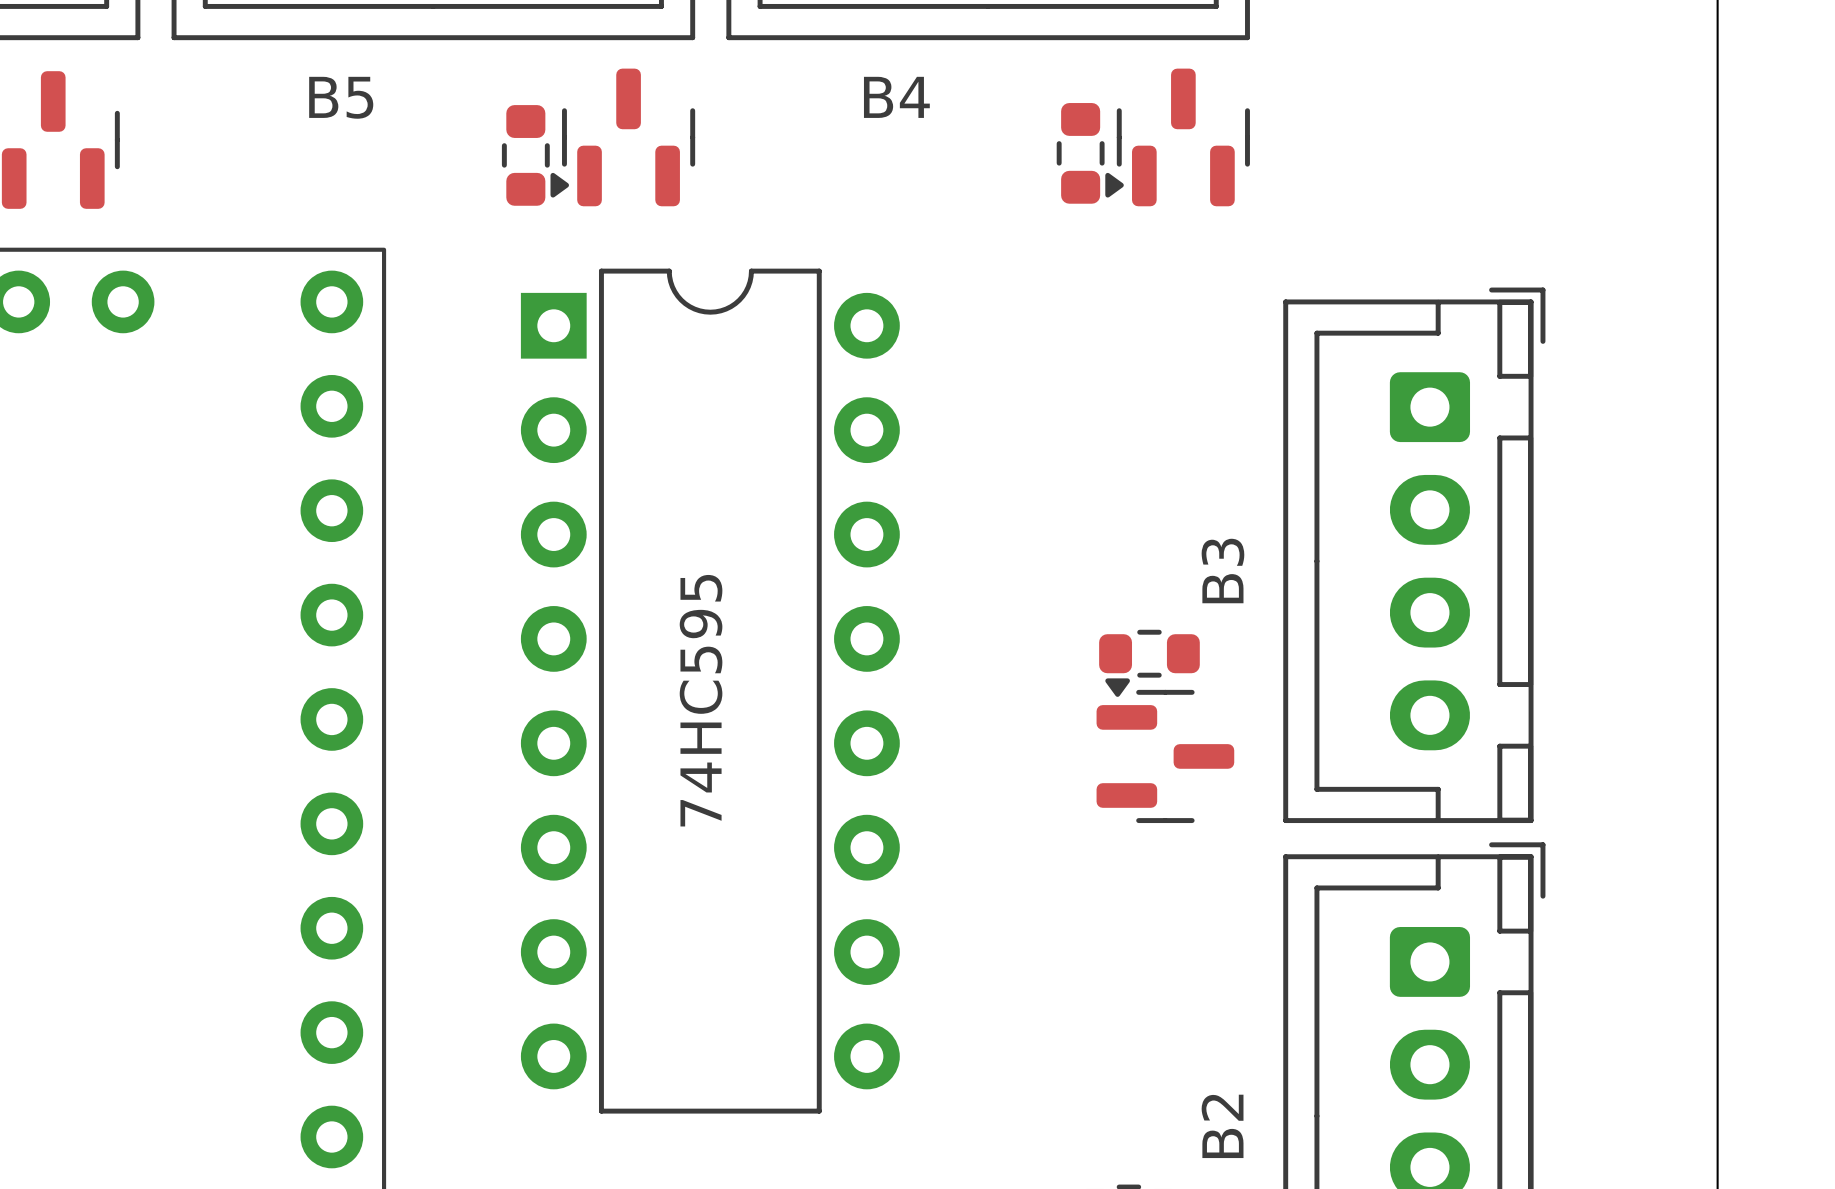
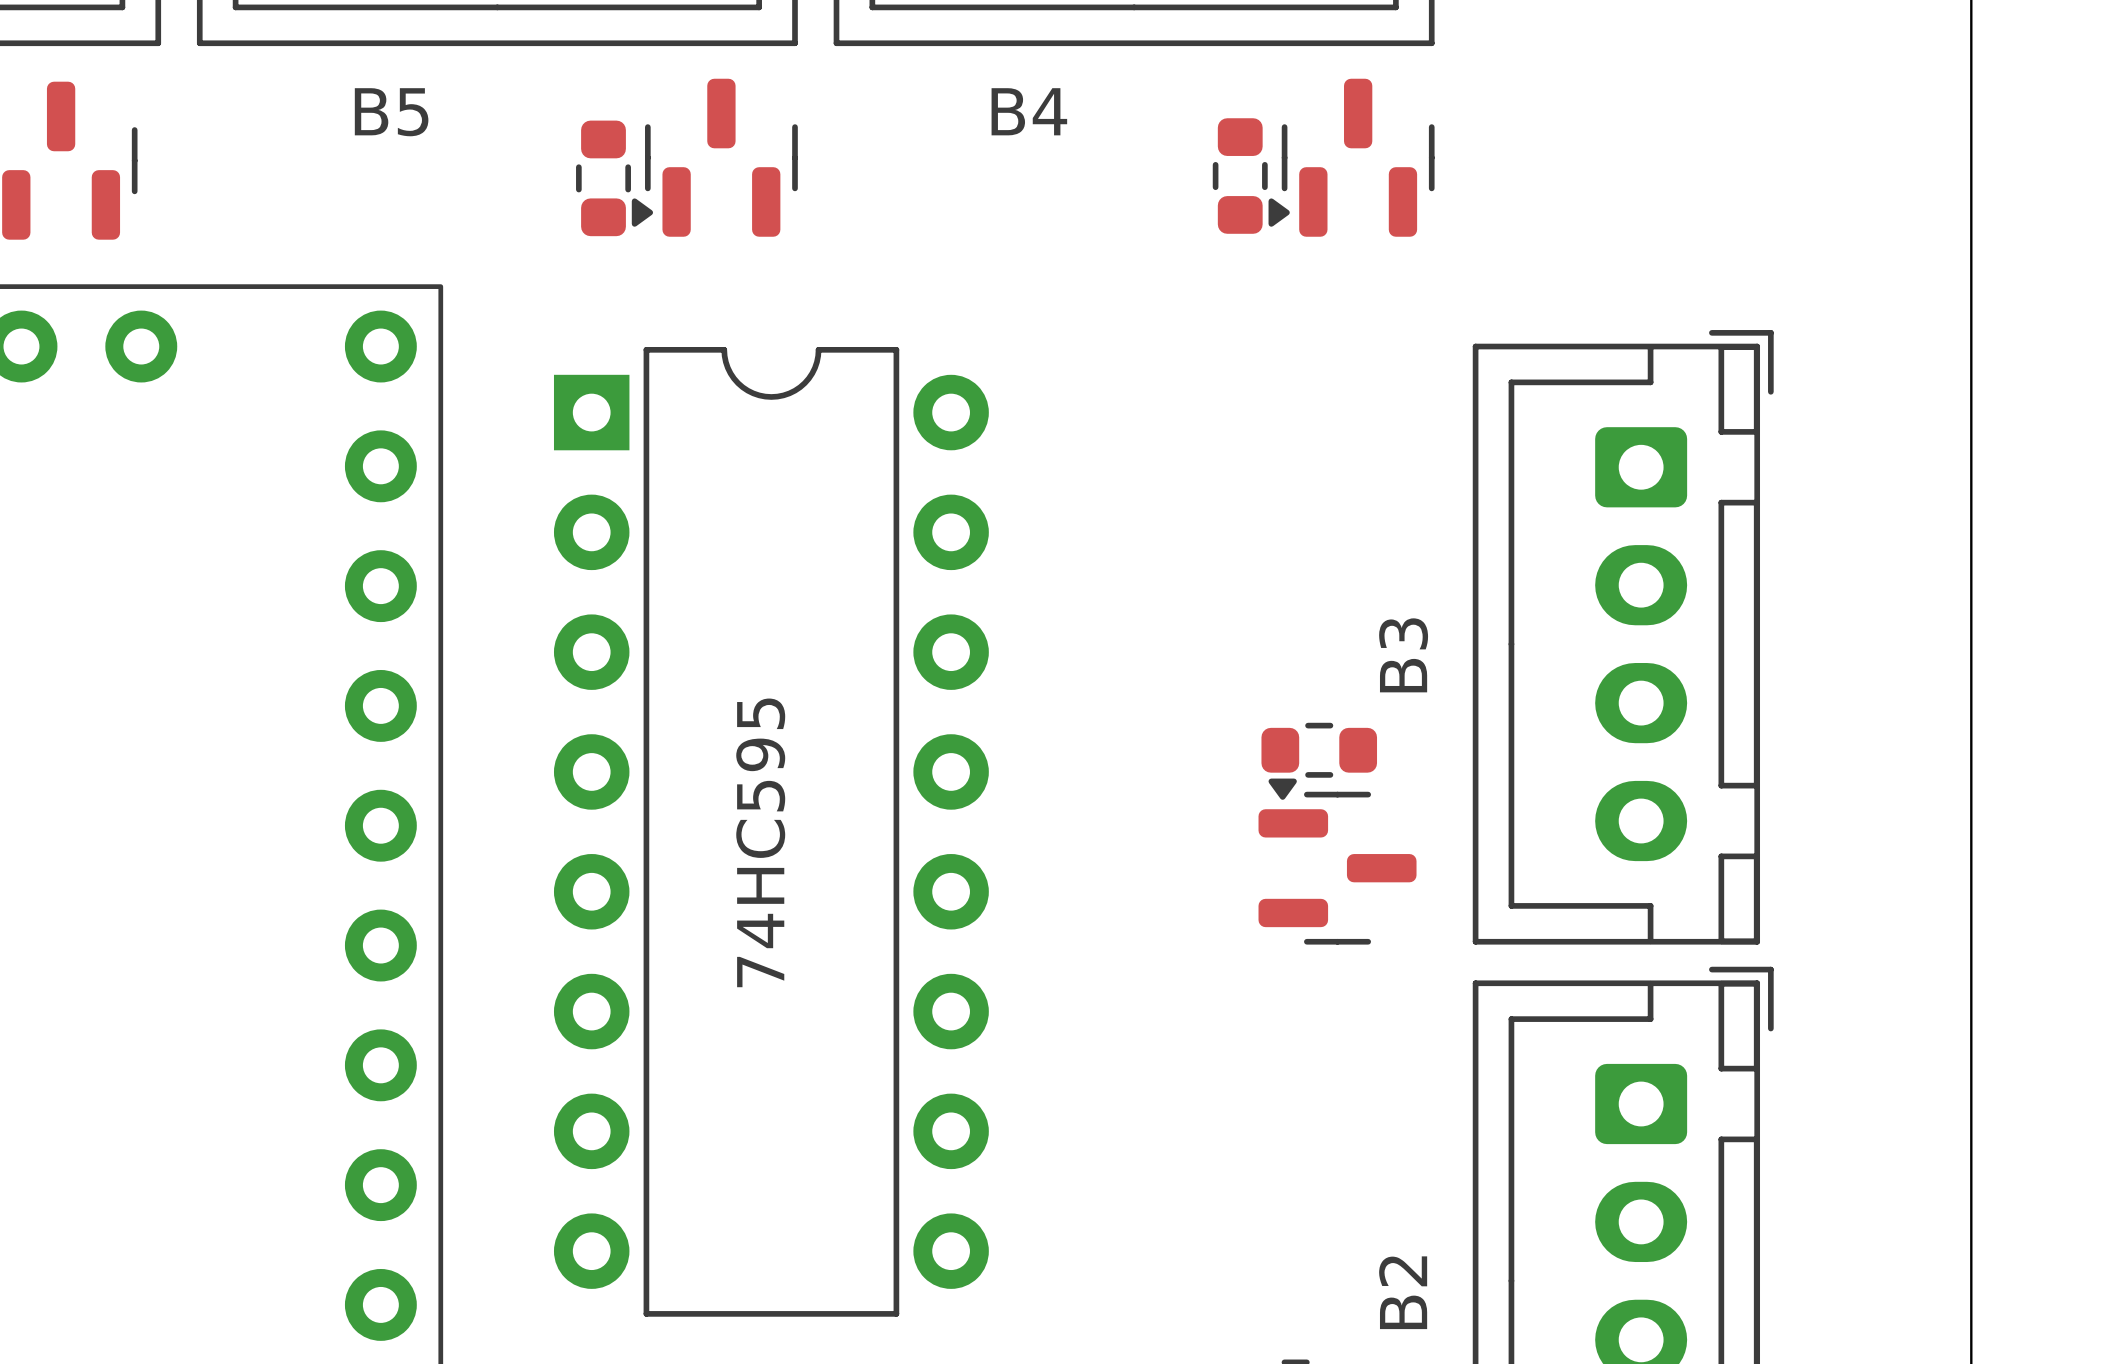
part position: (710, 691) -> (771, 831)

